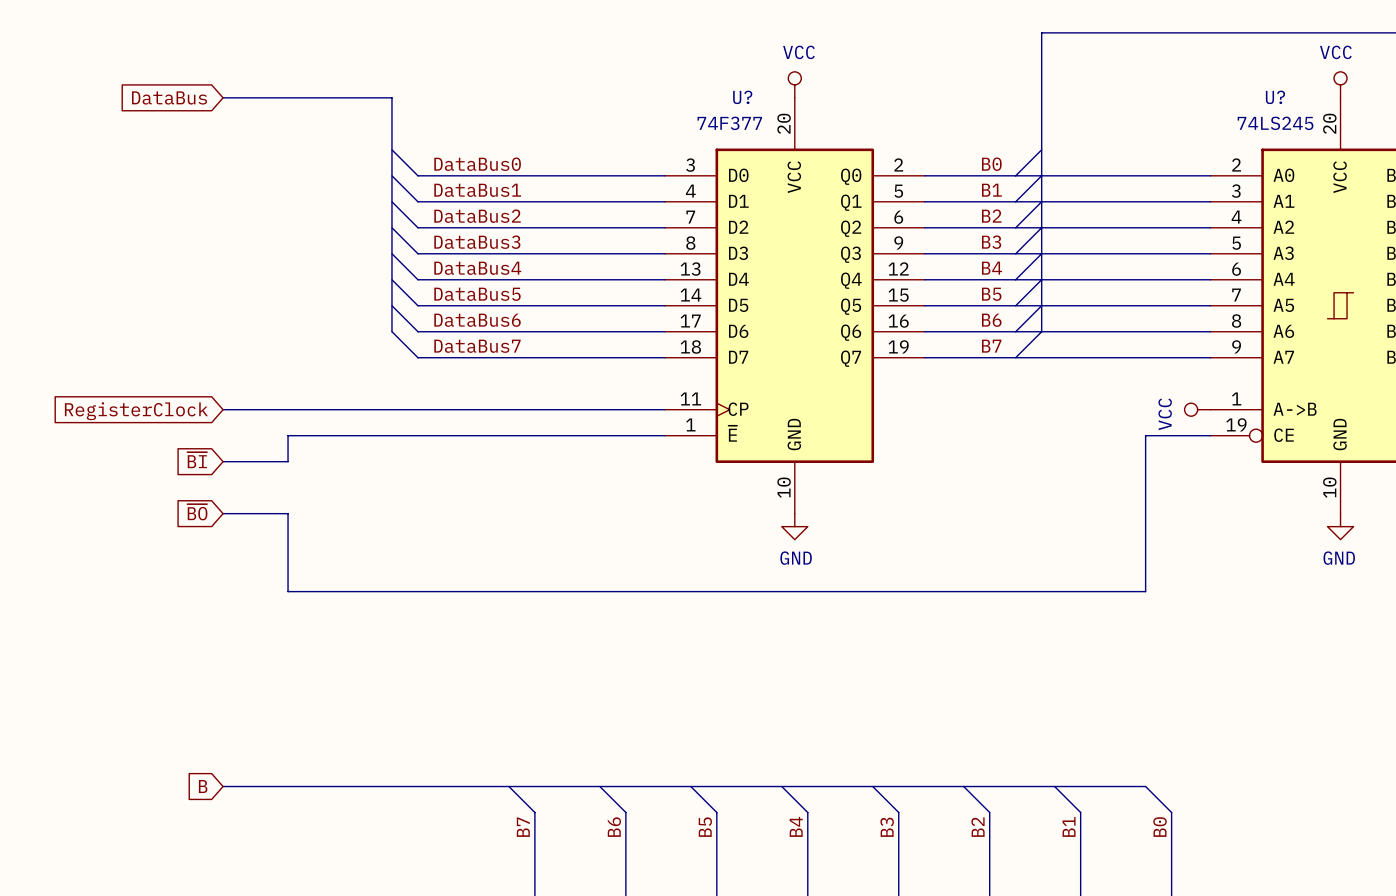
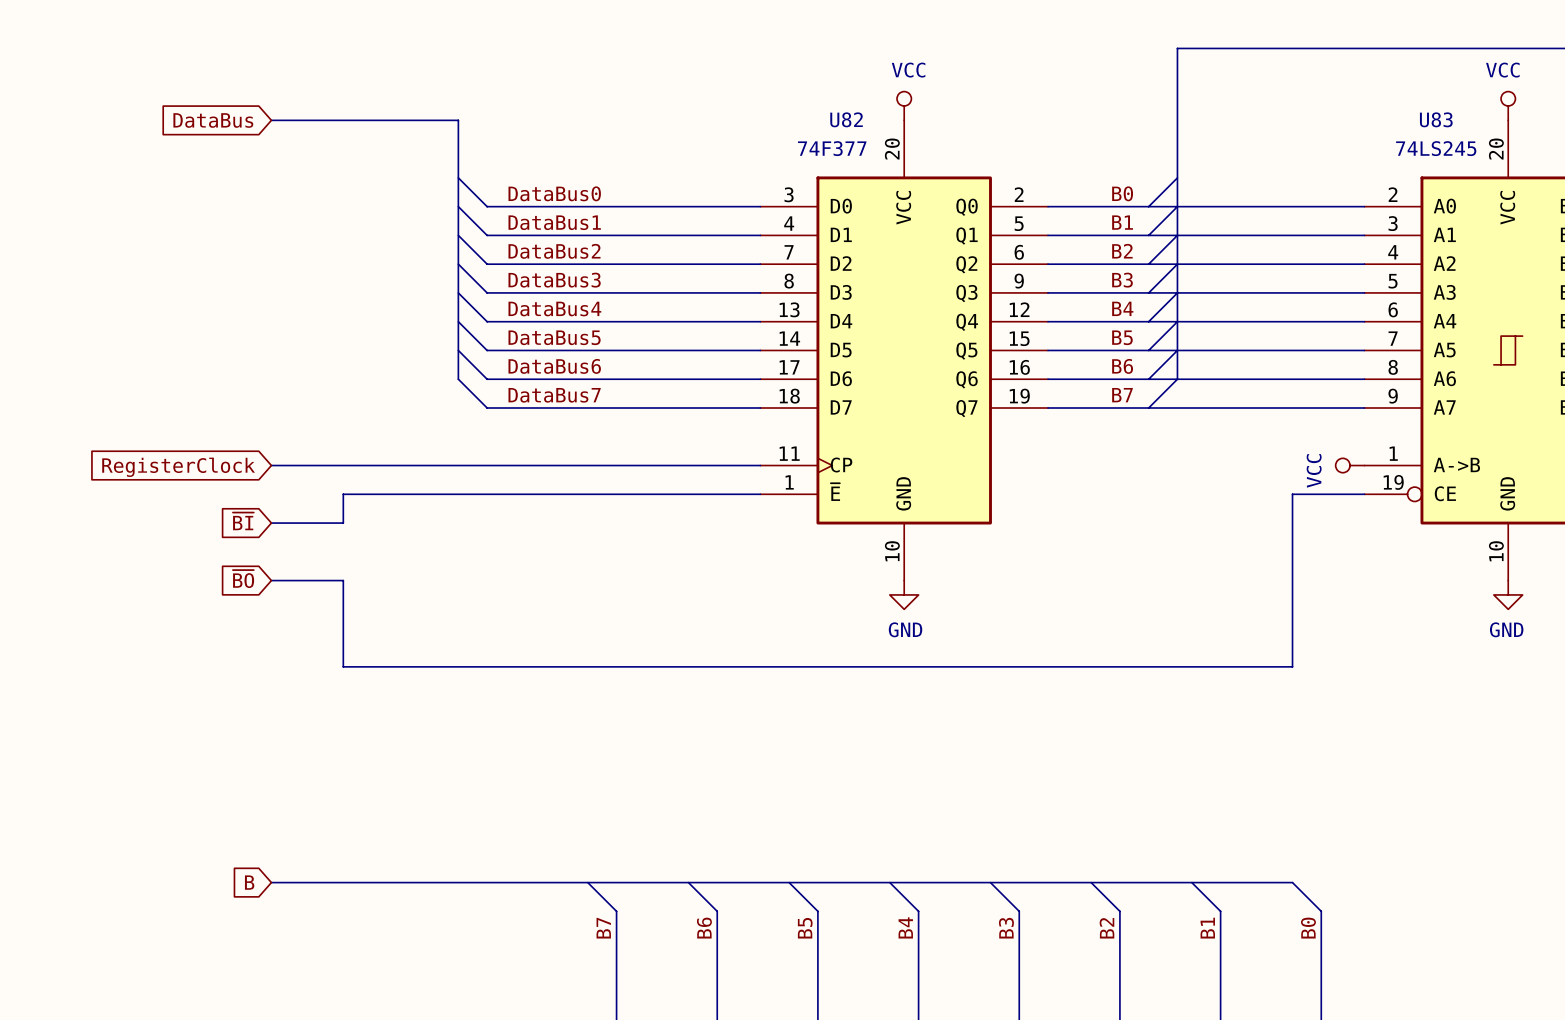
U? name: U? (742, 97) -> U82 (846, 119)
U? name: U? (1275, 97) -> U83 (1436, 119)

